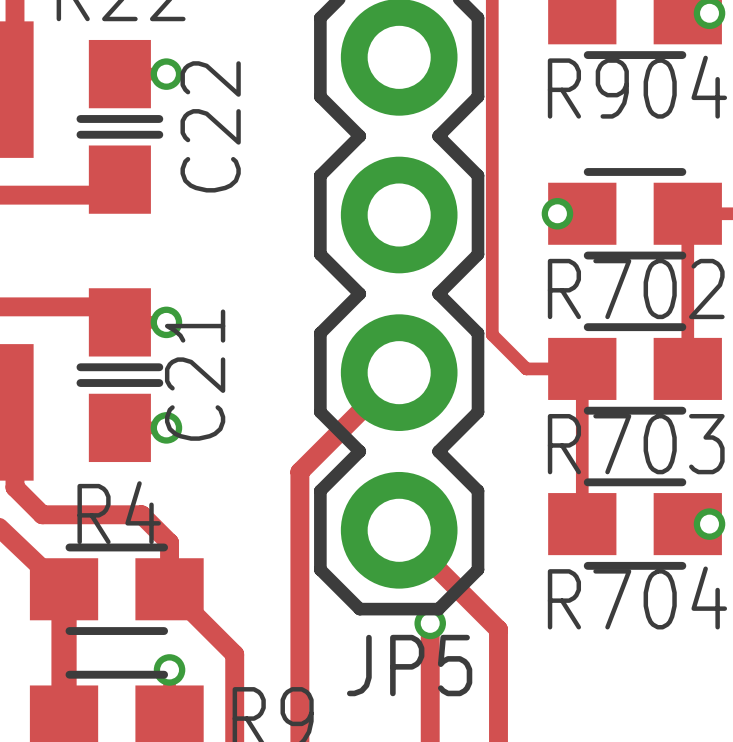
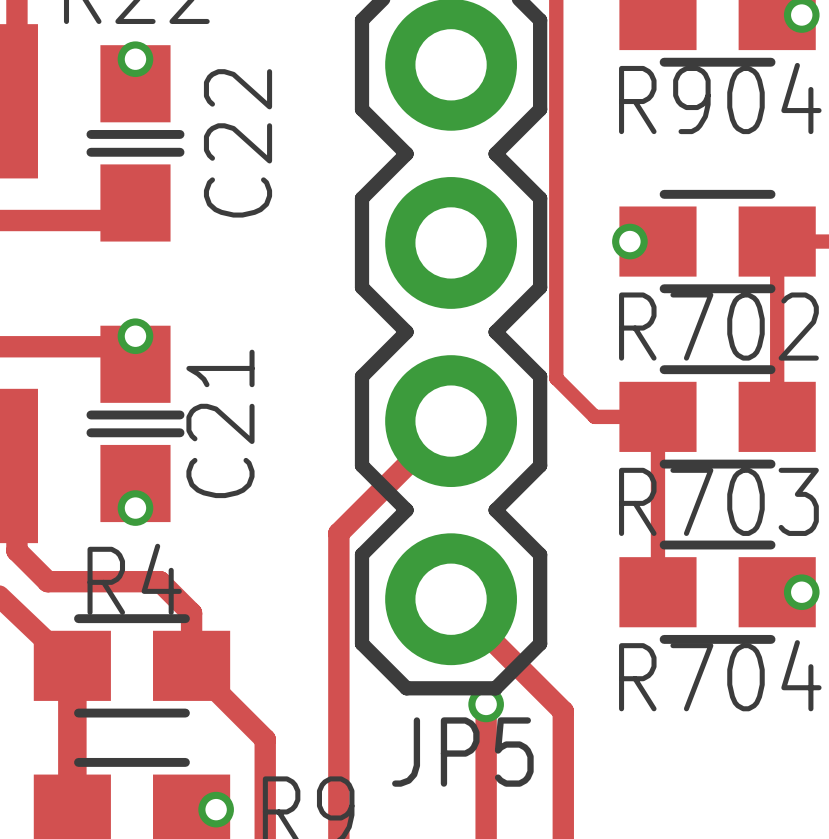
via position: (166, 74) -> (135, 59)
via position: (166, 322) -> (135, 336)
via position: (166, 427) -> (135, 508)
via position: (169, 669) -> (216, 809)

